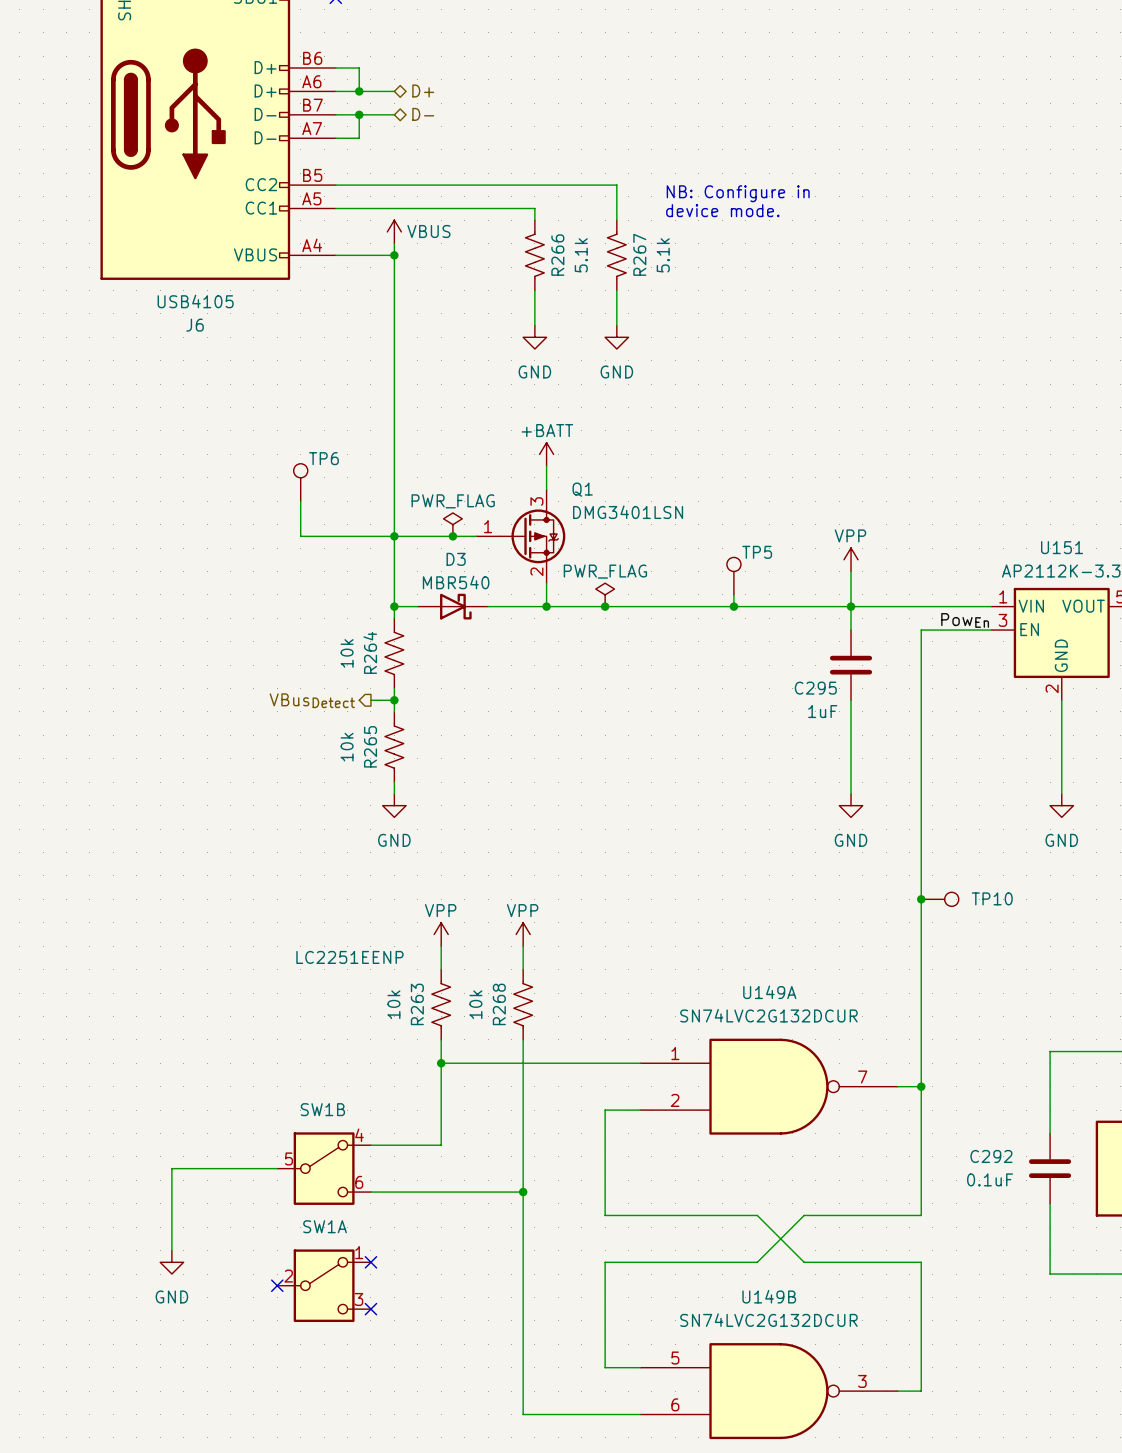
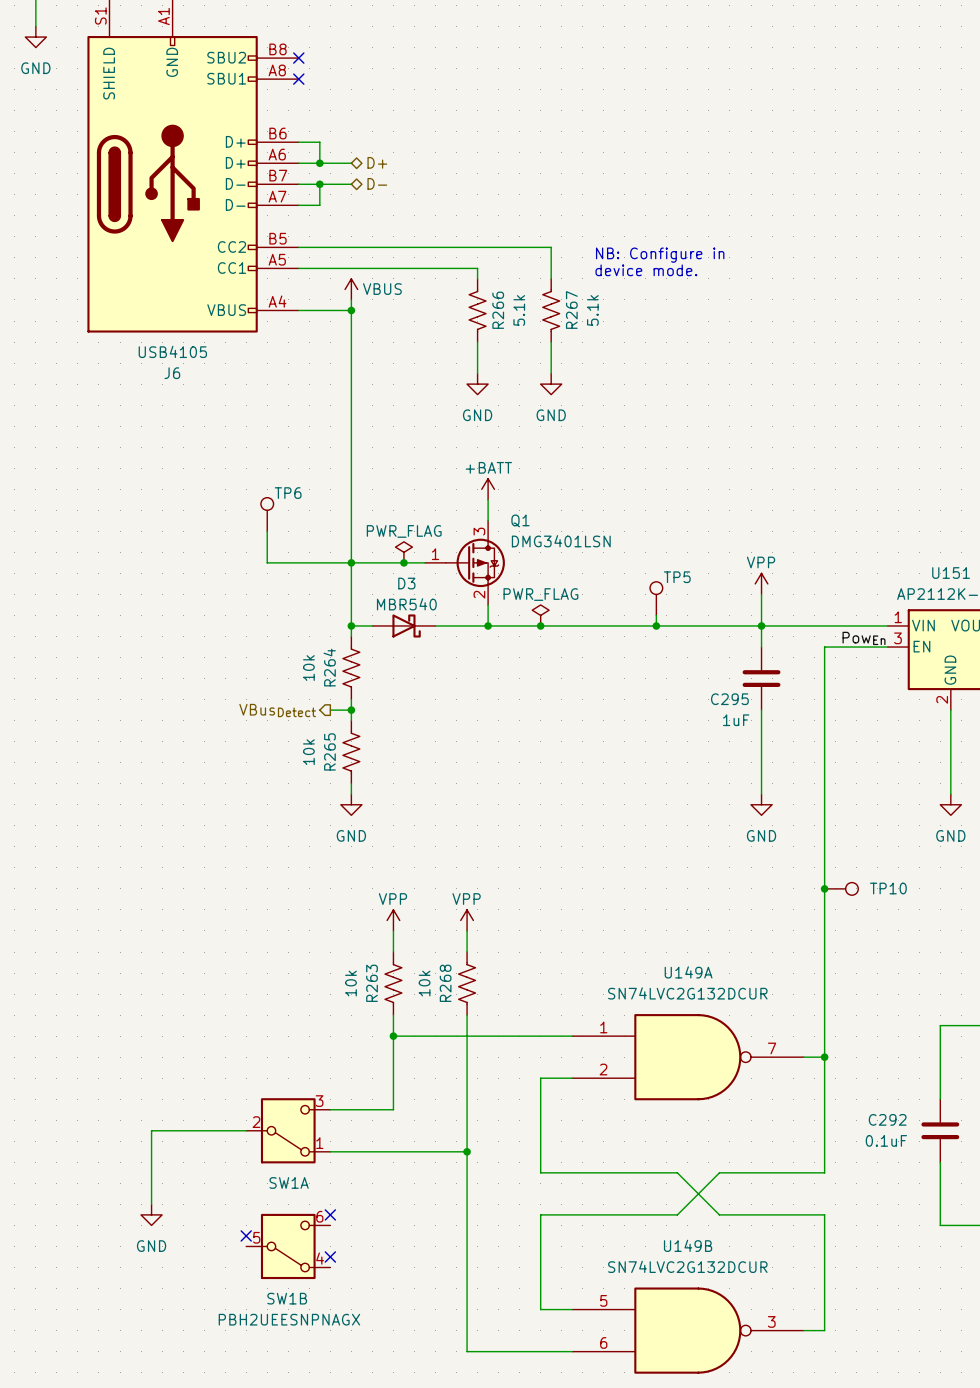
SW1B value: LC2251EENP (349, 957) -> PBH2UEESNPNAGX (289, 1319)
SW1B flip: as is (324, 1168) -> up-down (288, 1246)
SW1B position: (324, 1168) -> (288, 1246)
SW1A flip: as is (324, 1285) -> up-down (288, 1130)
SW1A position: (324, 1285) -> (288, 1130)

